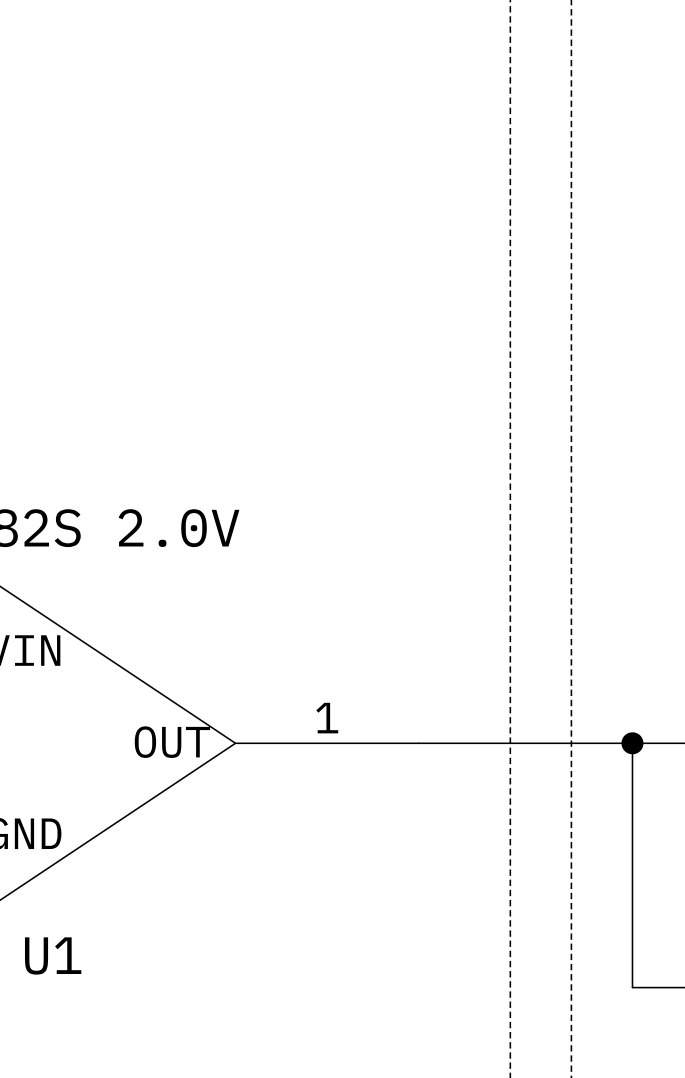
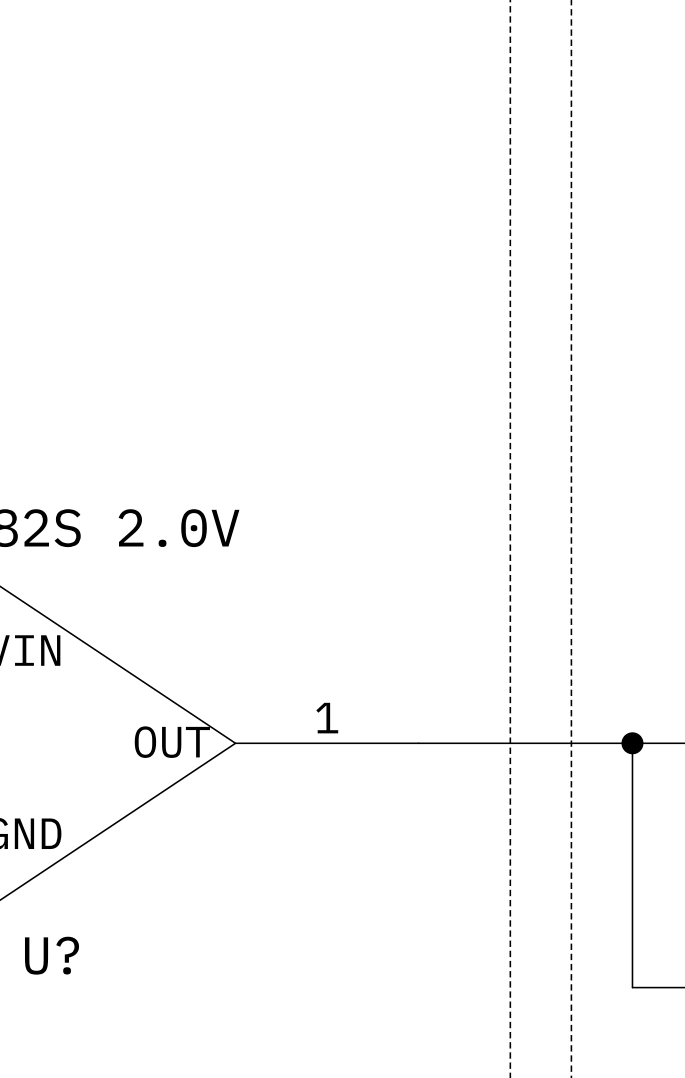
U1 name: U1 (53, 956) -> U? (52, 955)

